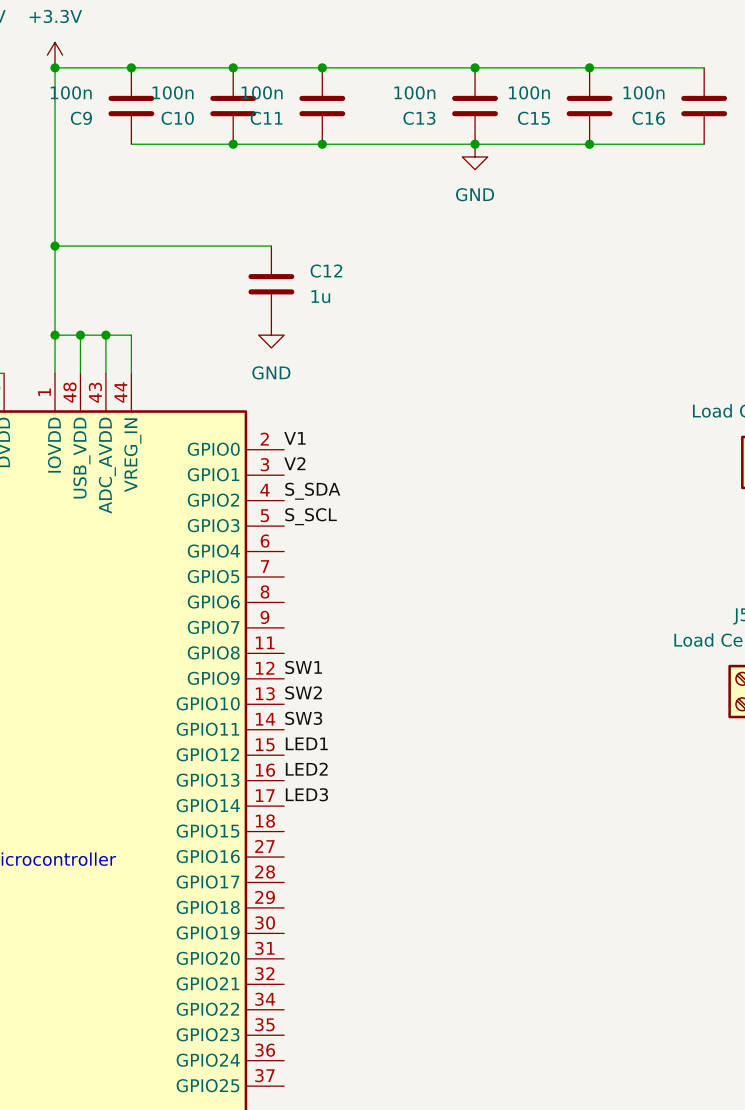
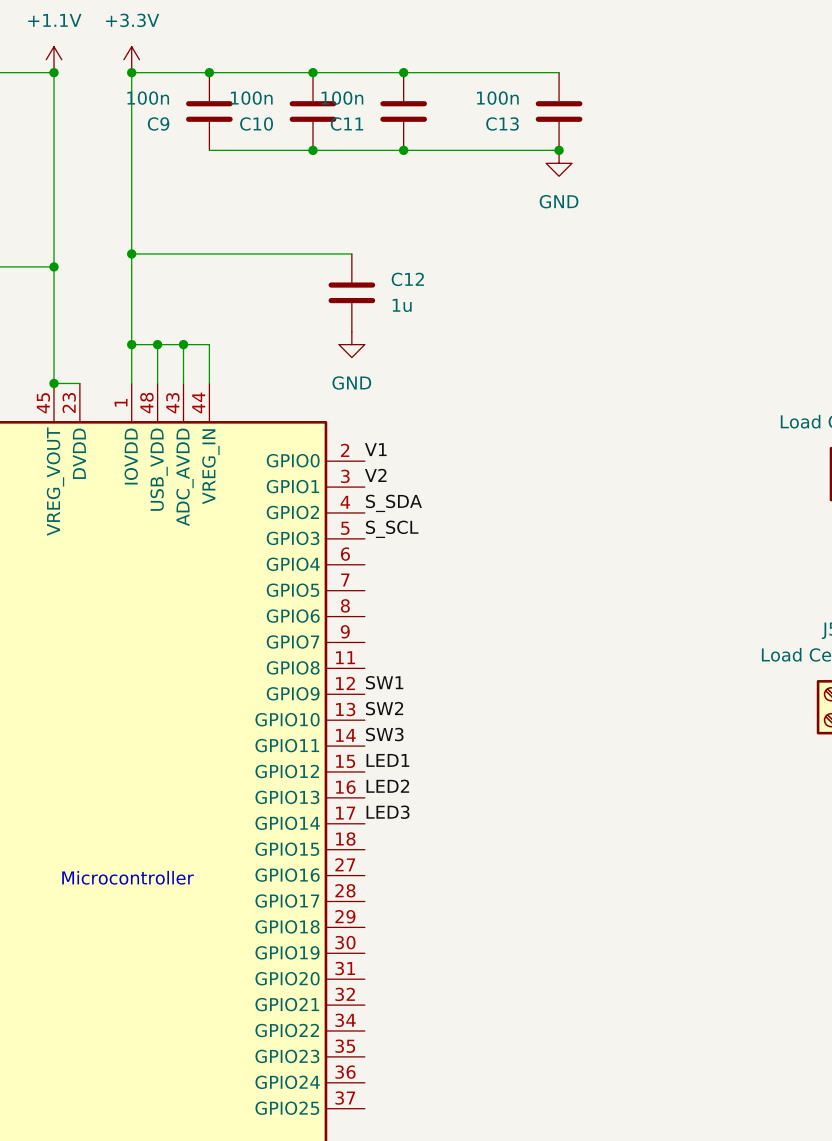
wire: (475, 67) (704, 67) -> none
junction: (475, 67) -> none
junction: (589, 67) -> none
C15: 100n (589, 106) -> none
C16: 100n (704, 106) -> none
wire: (475, 144) (704, 144) -> none
junction: (589, 144) -> none

